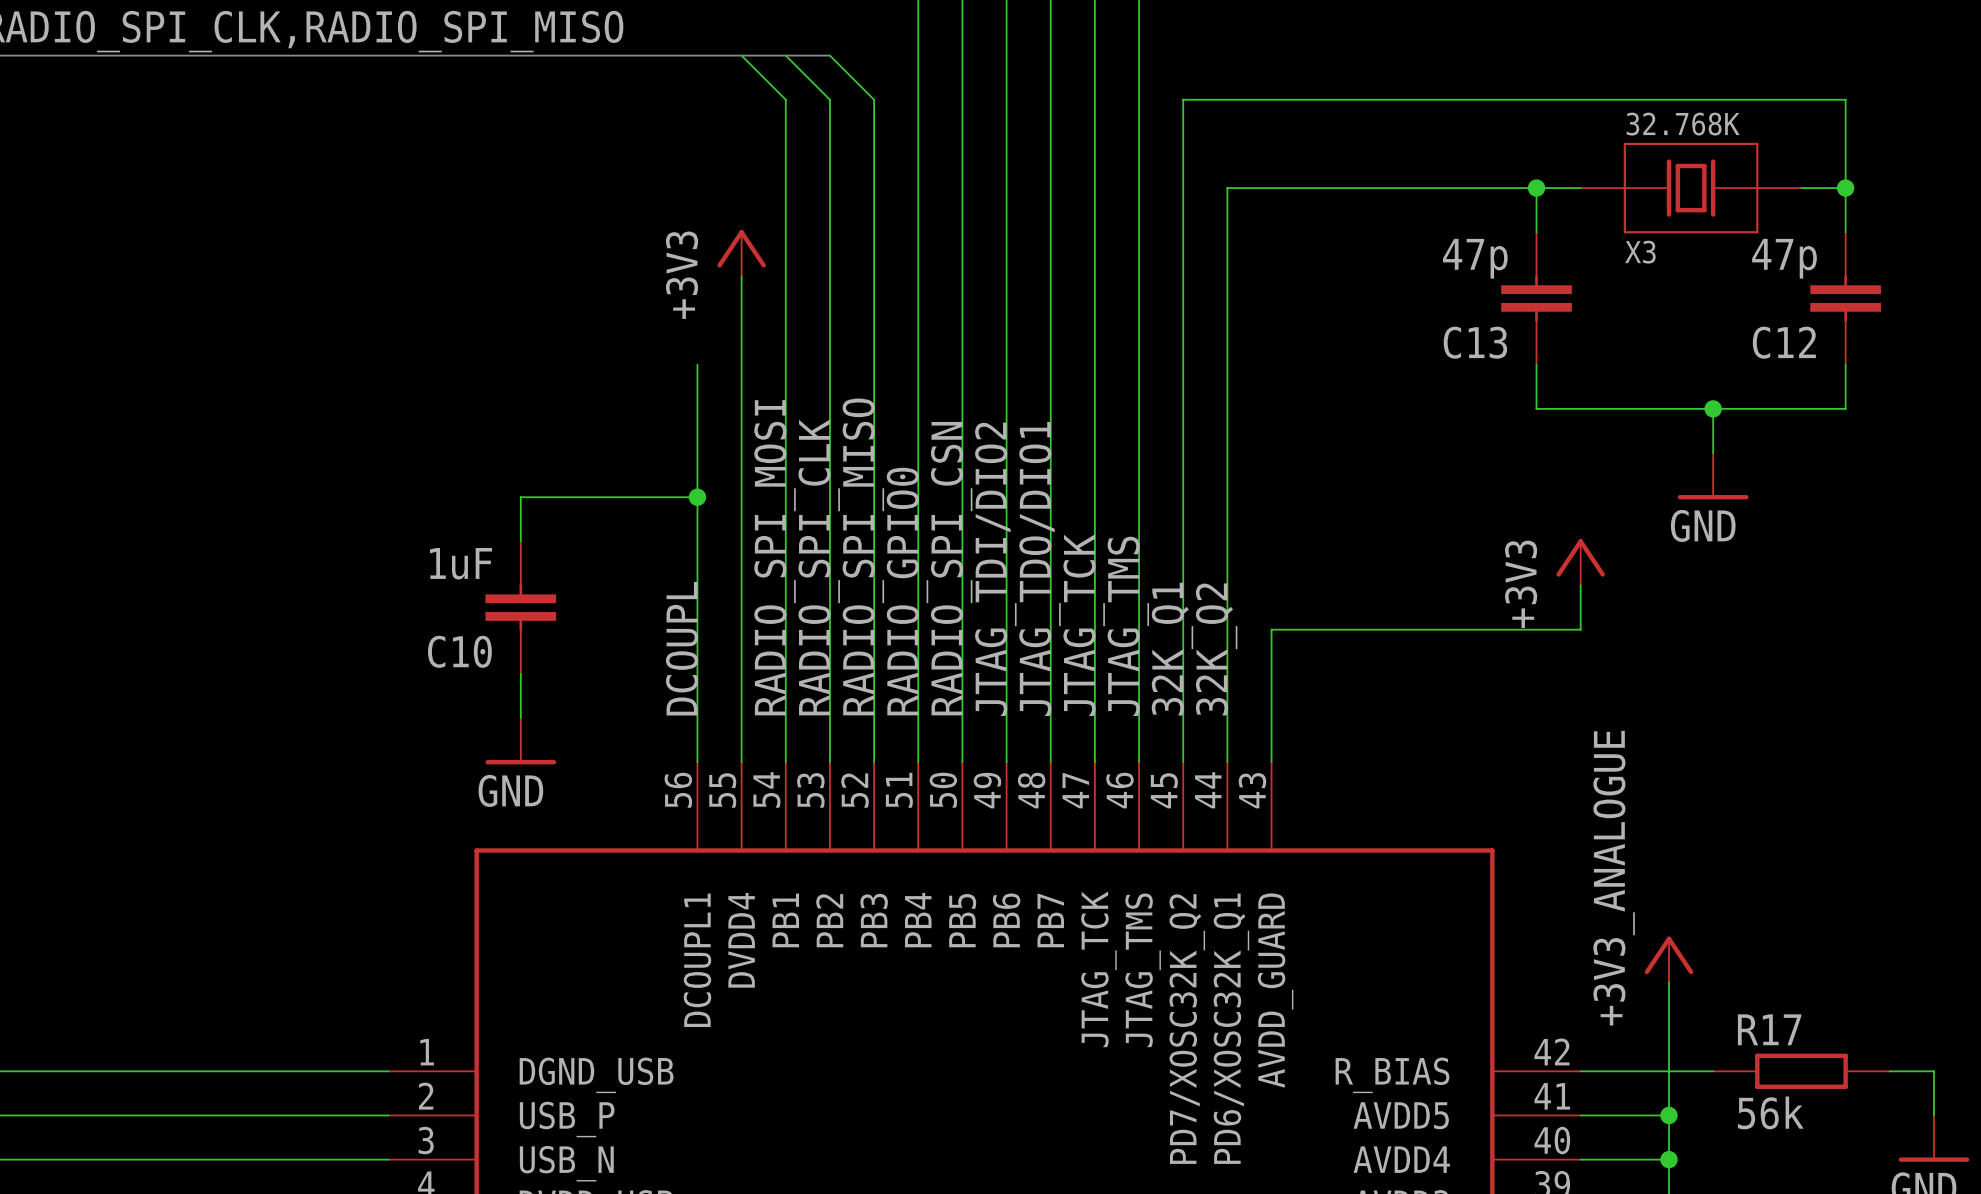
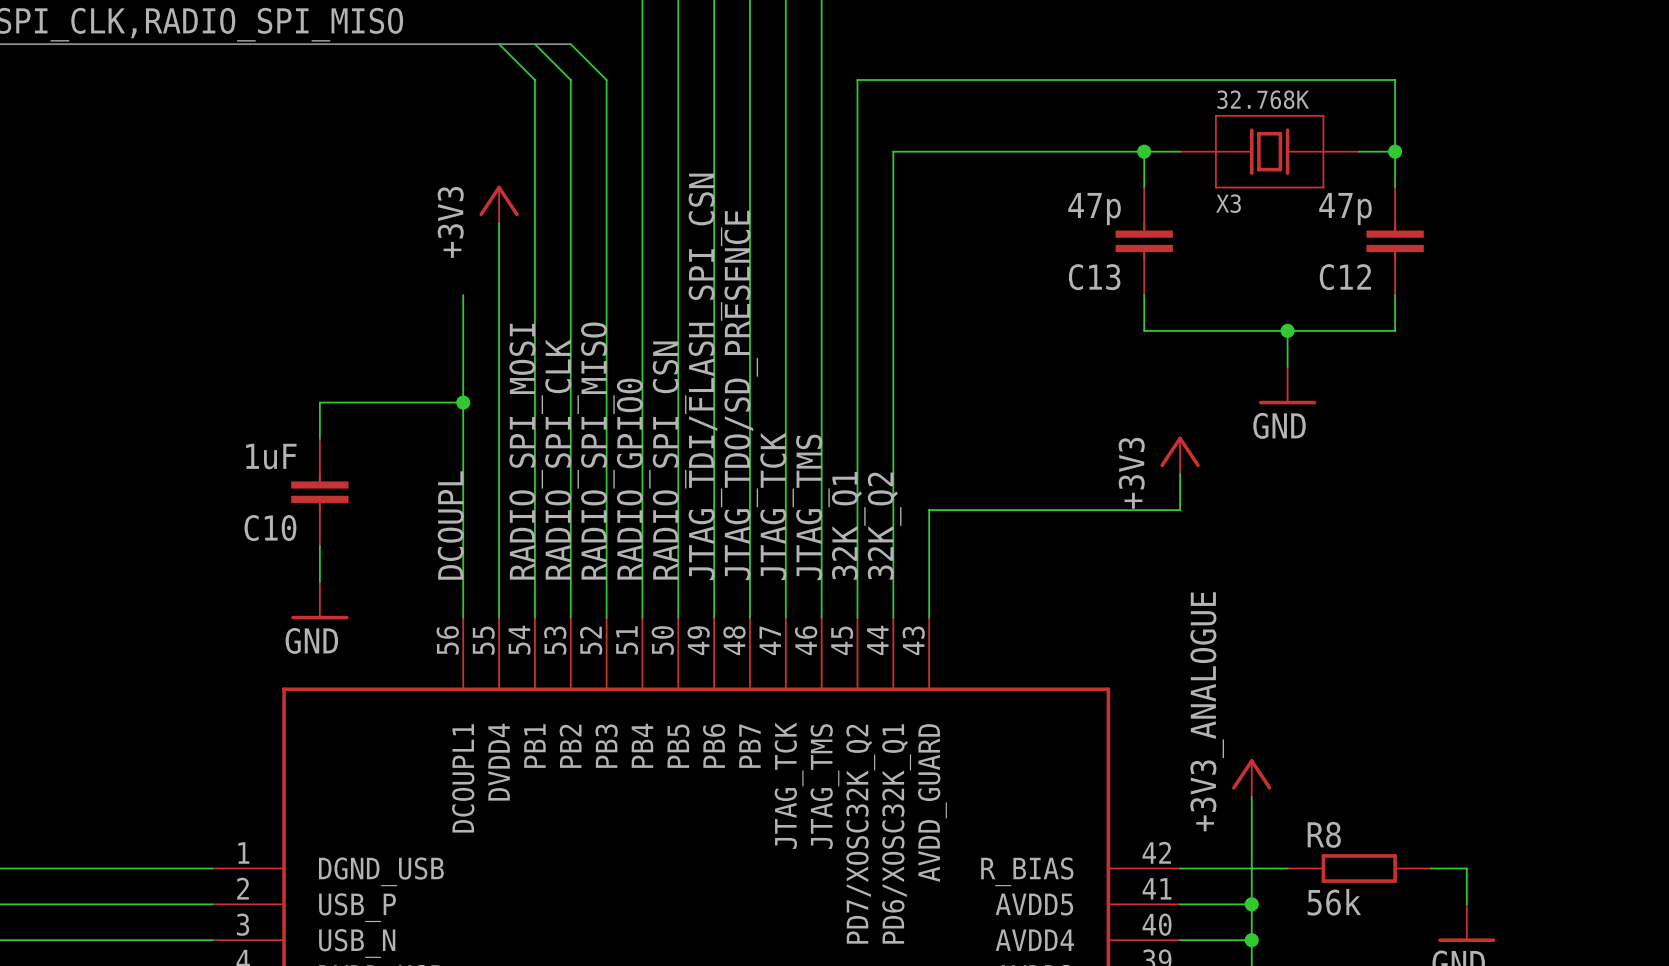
label: JTAG_TDO/DIO1 (1040, 568) -> JTAG_TDO/SD_PRESENCE (741, 395)
label: JTAG_TDI/DIO2 (995, 569) -> JTAG_TDI/FLASH_SPI_CSN (705, 376)
R17 name: R17 (1769, 1029) -> R8 (1324, 834)

